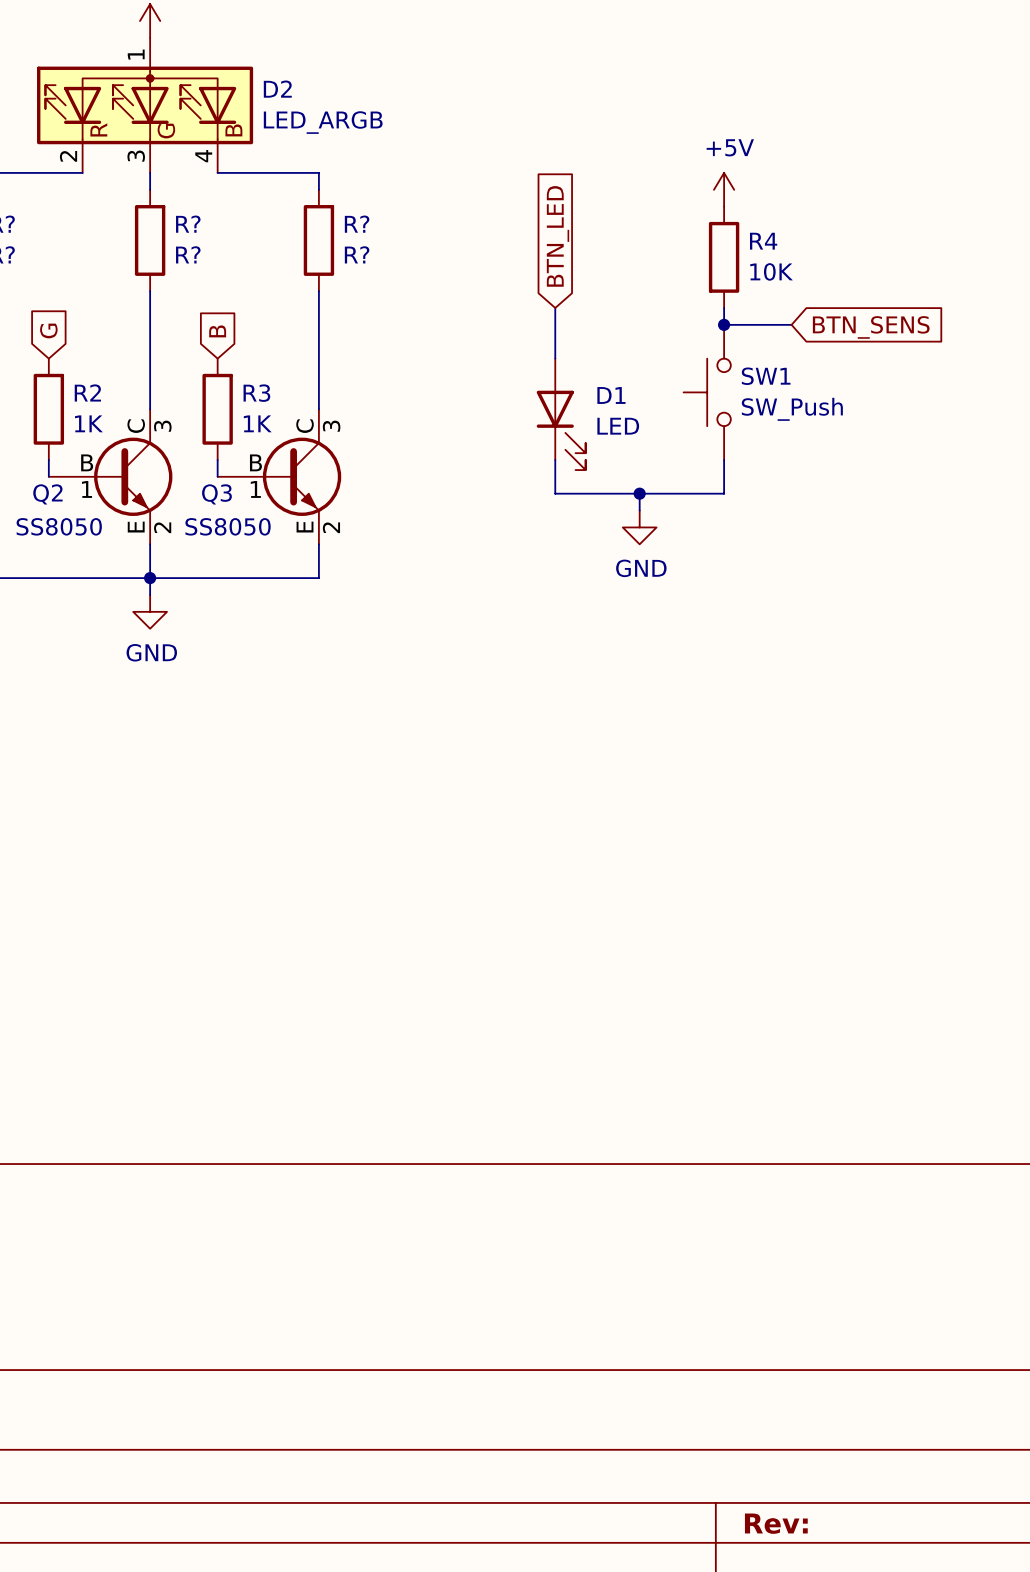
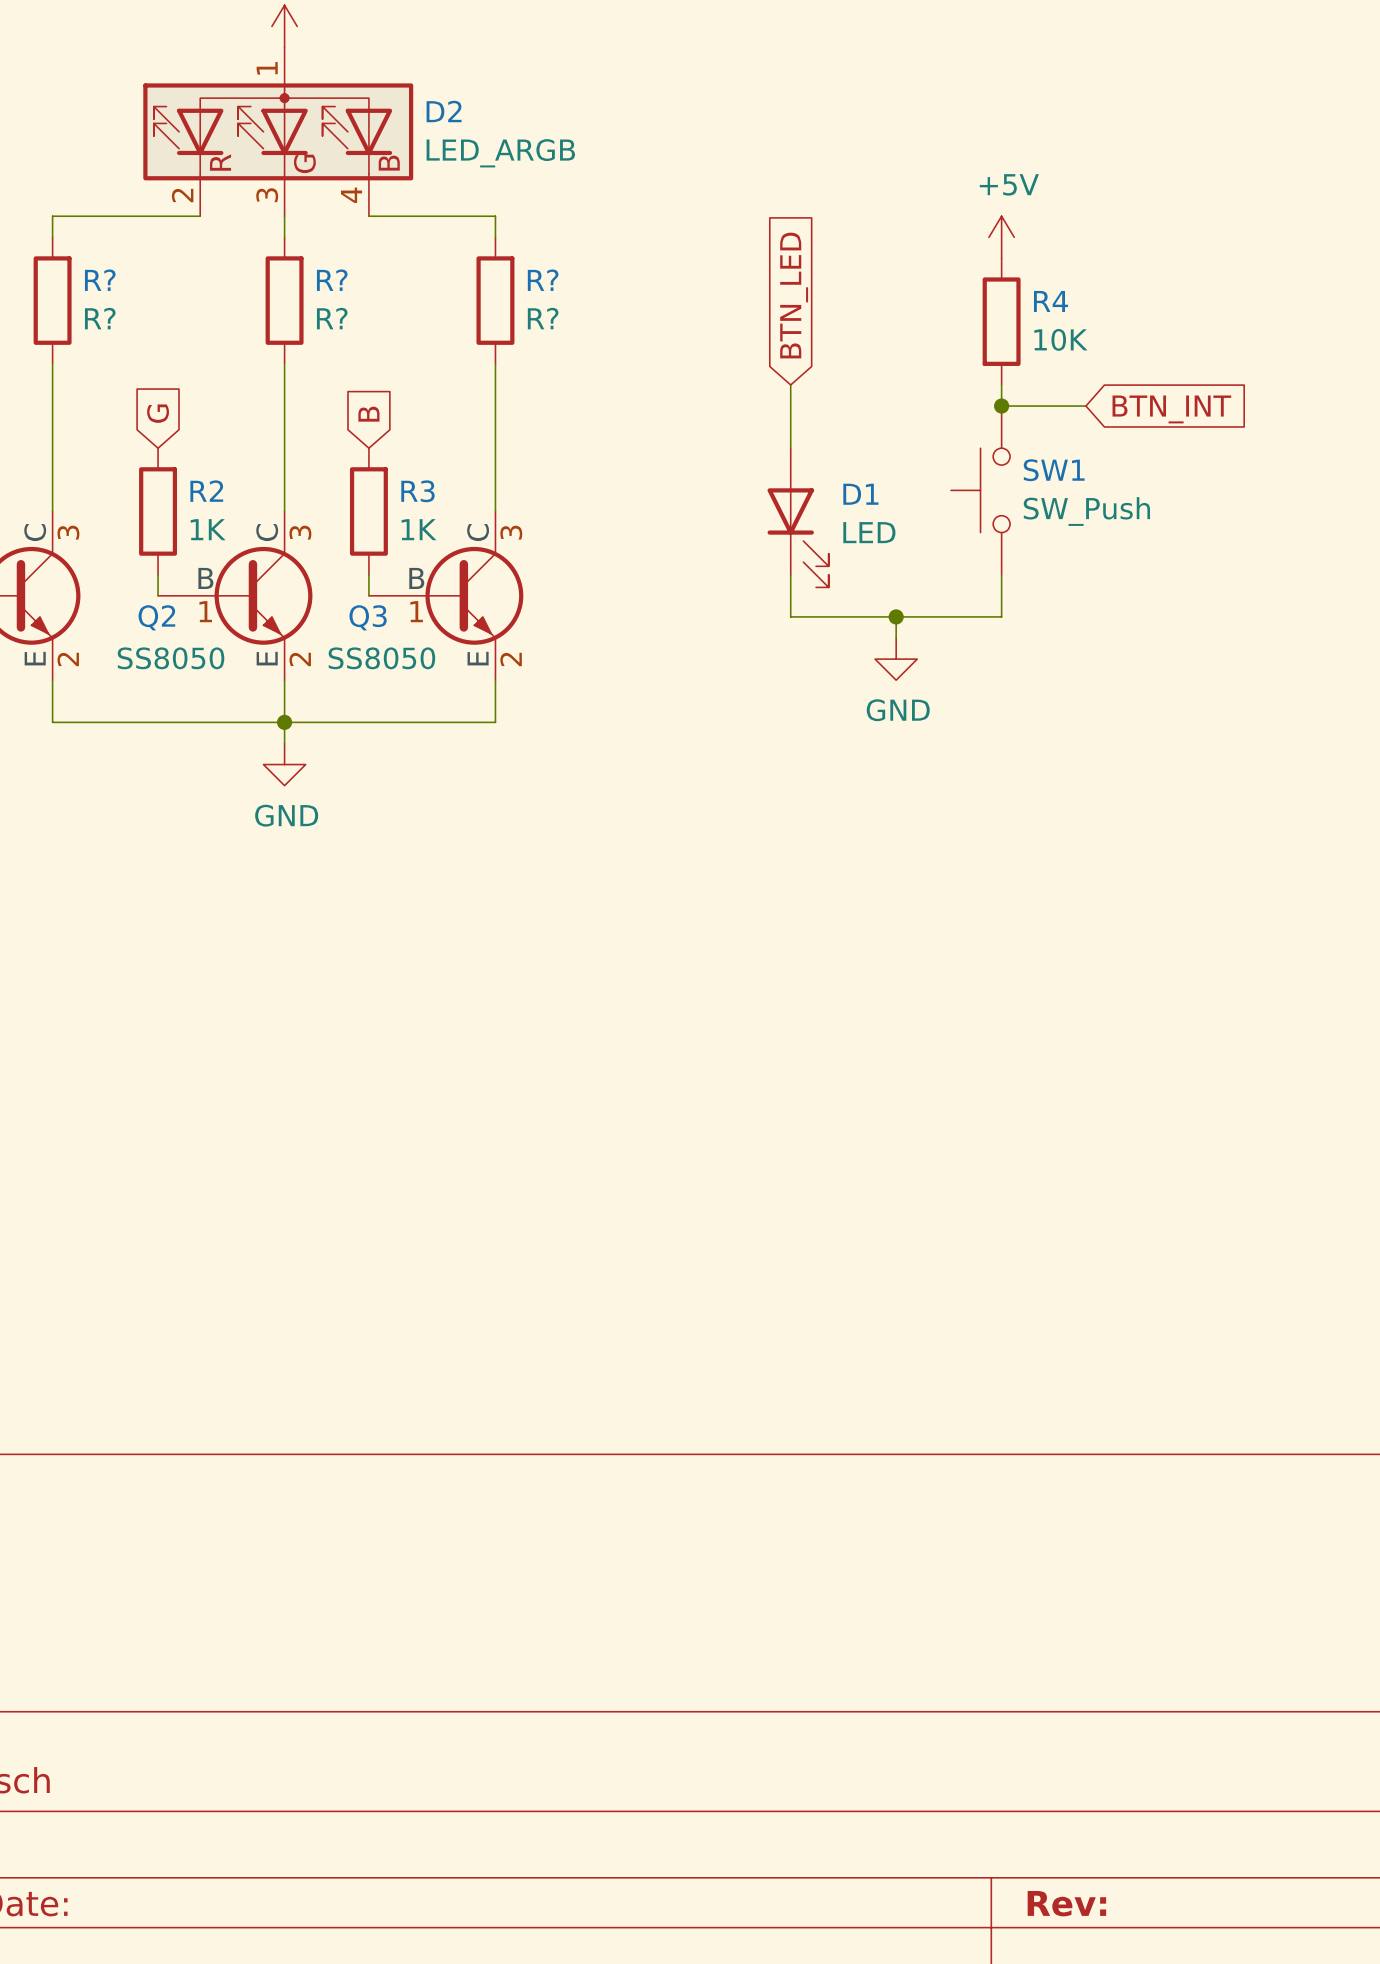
global label: BTN_SENS (871, 327) -> BTN_INT (1171, 409)

